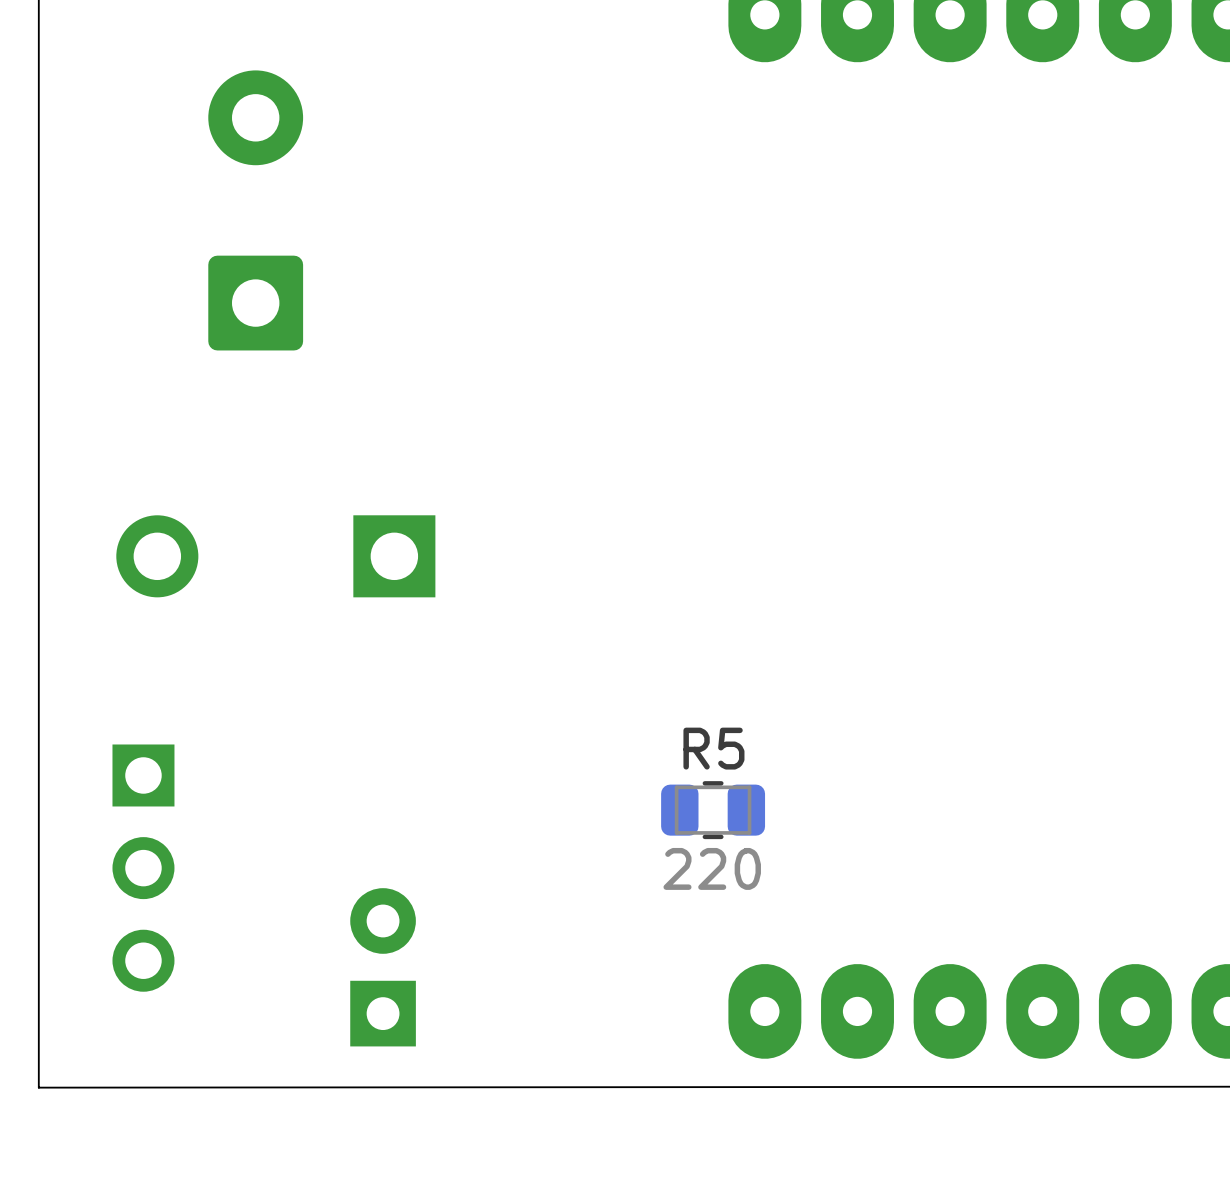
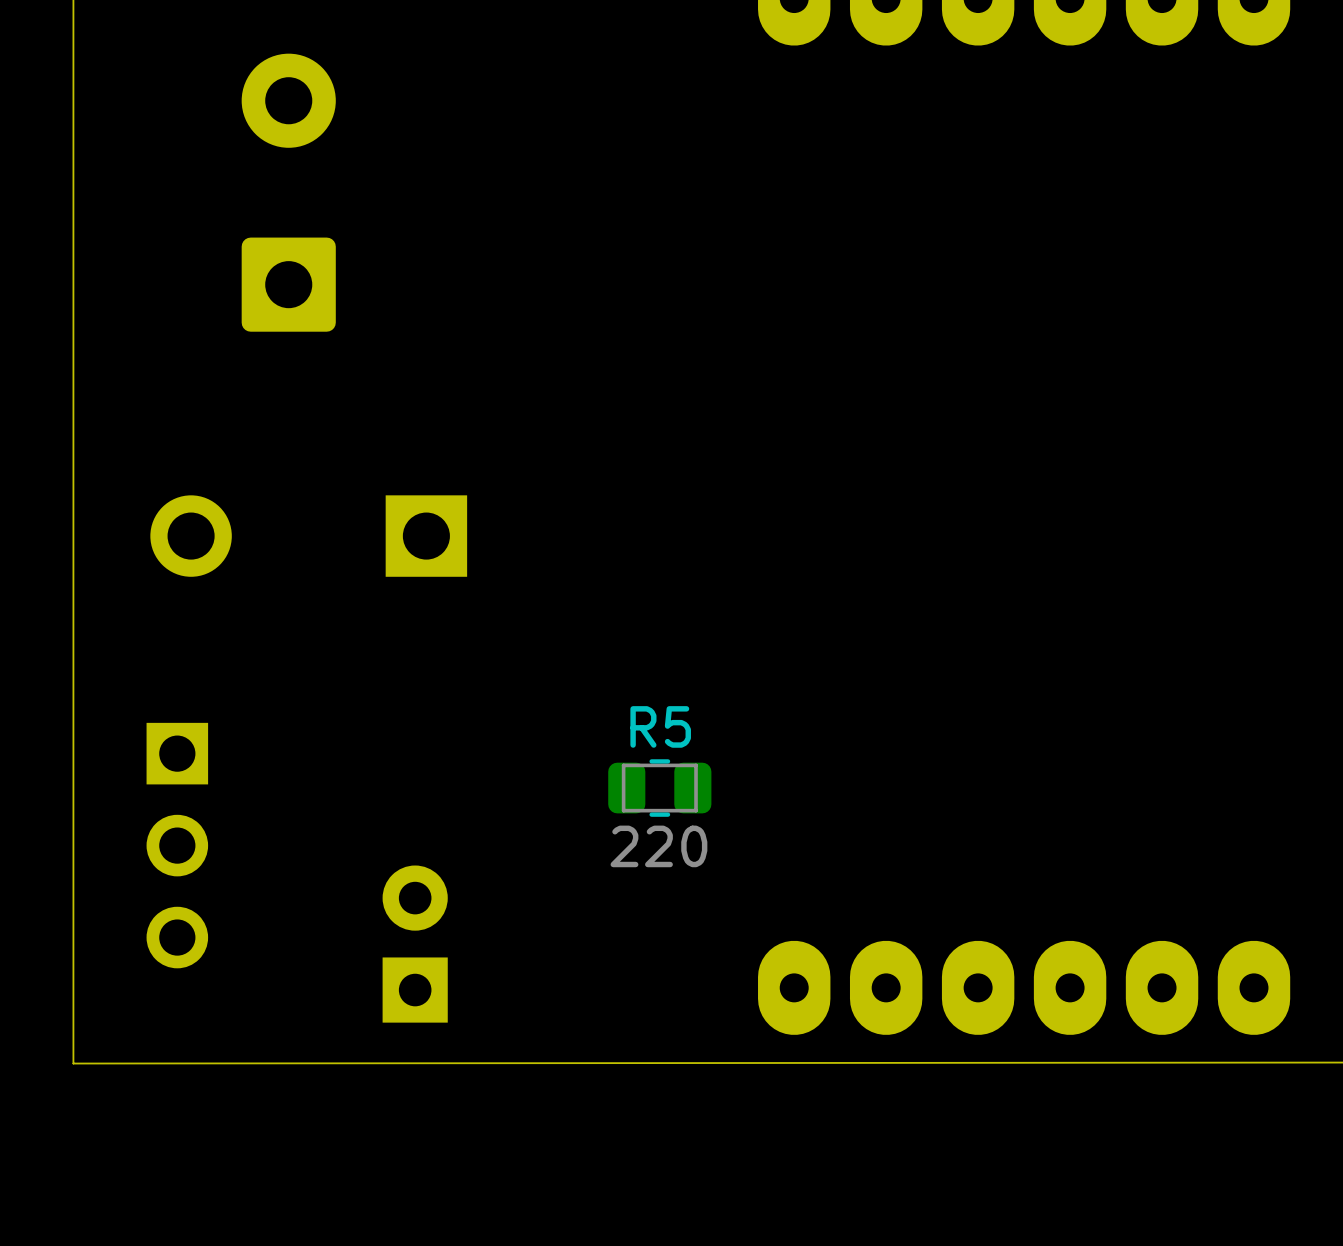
R5 position: (713, 810) -> (659, 788)

